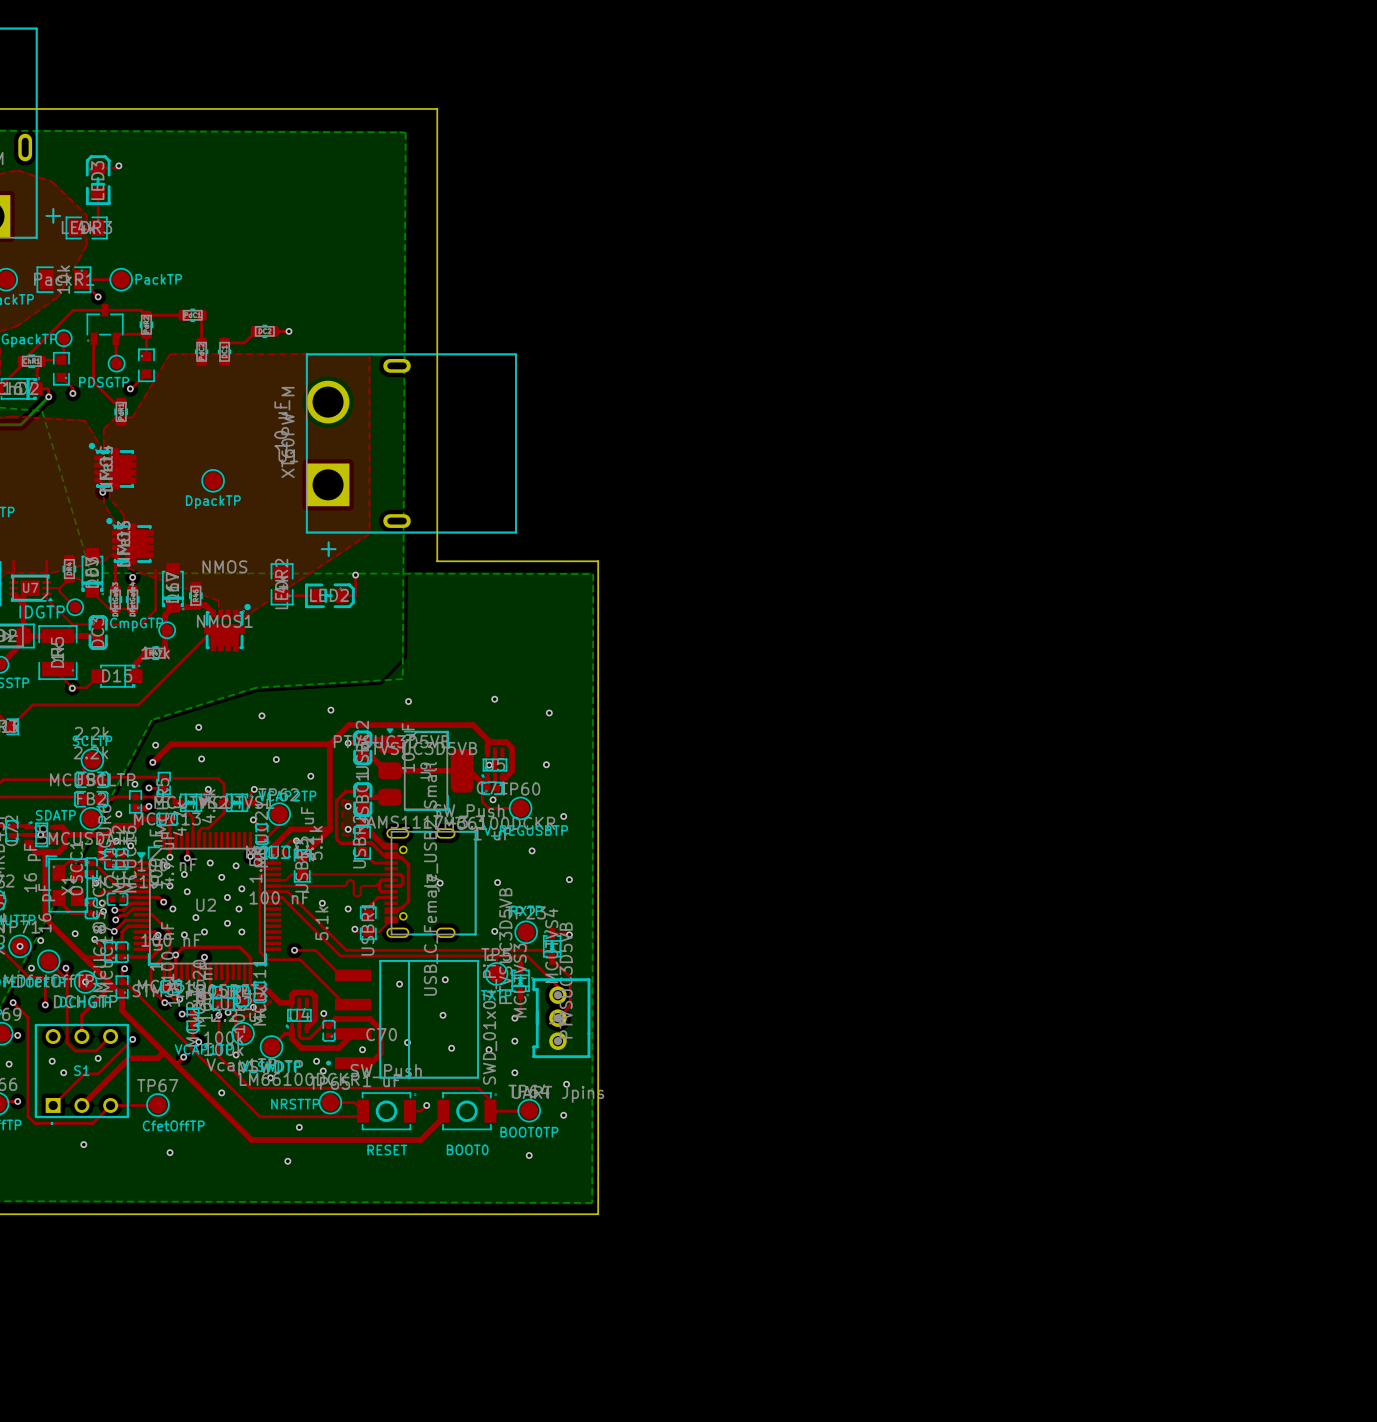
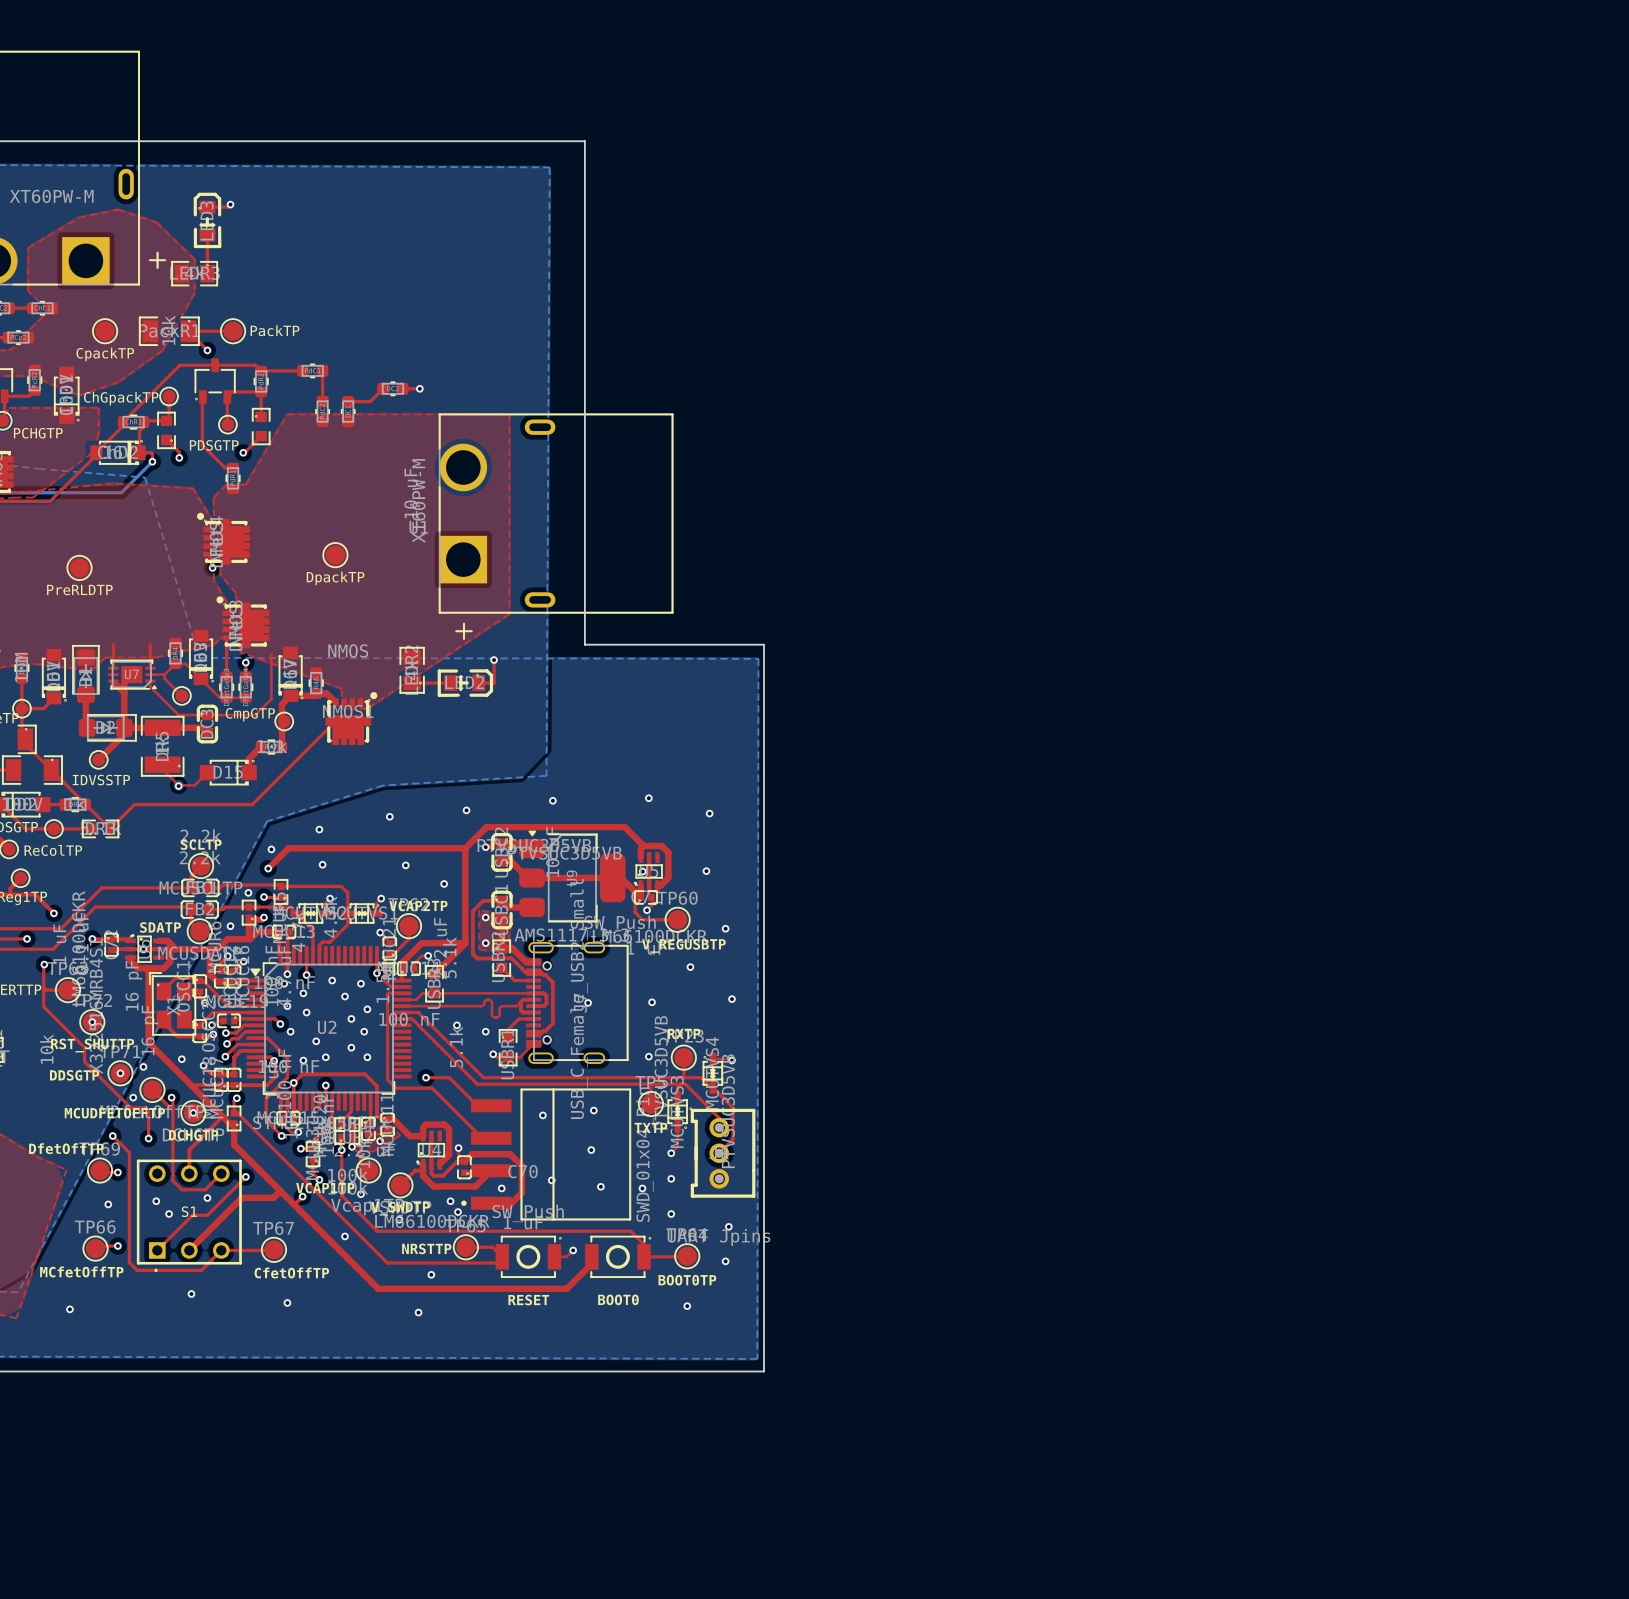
part value: IDGTP (42, 612) -> none

